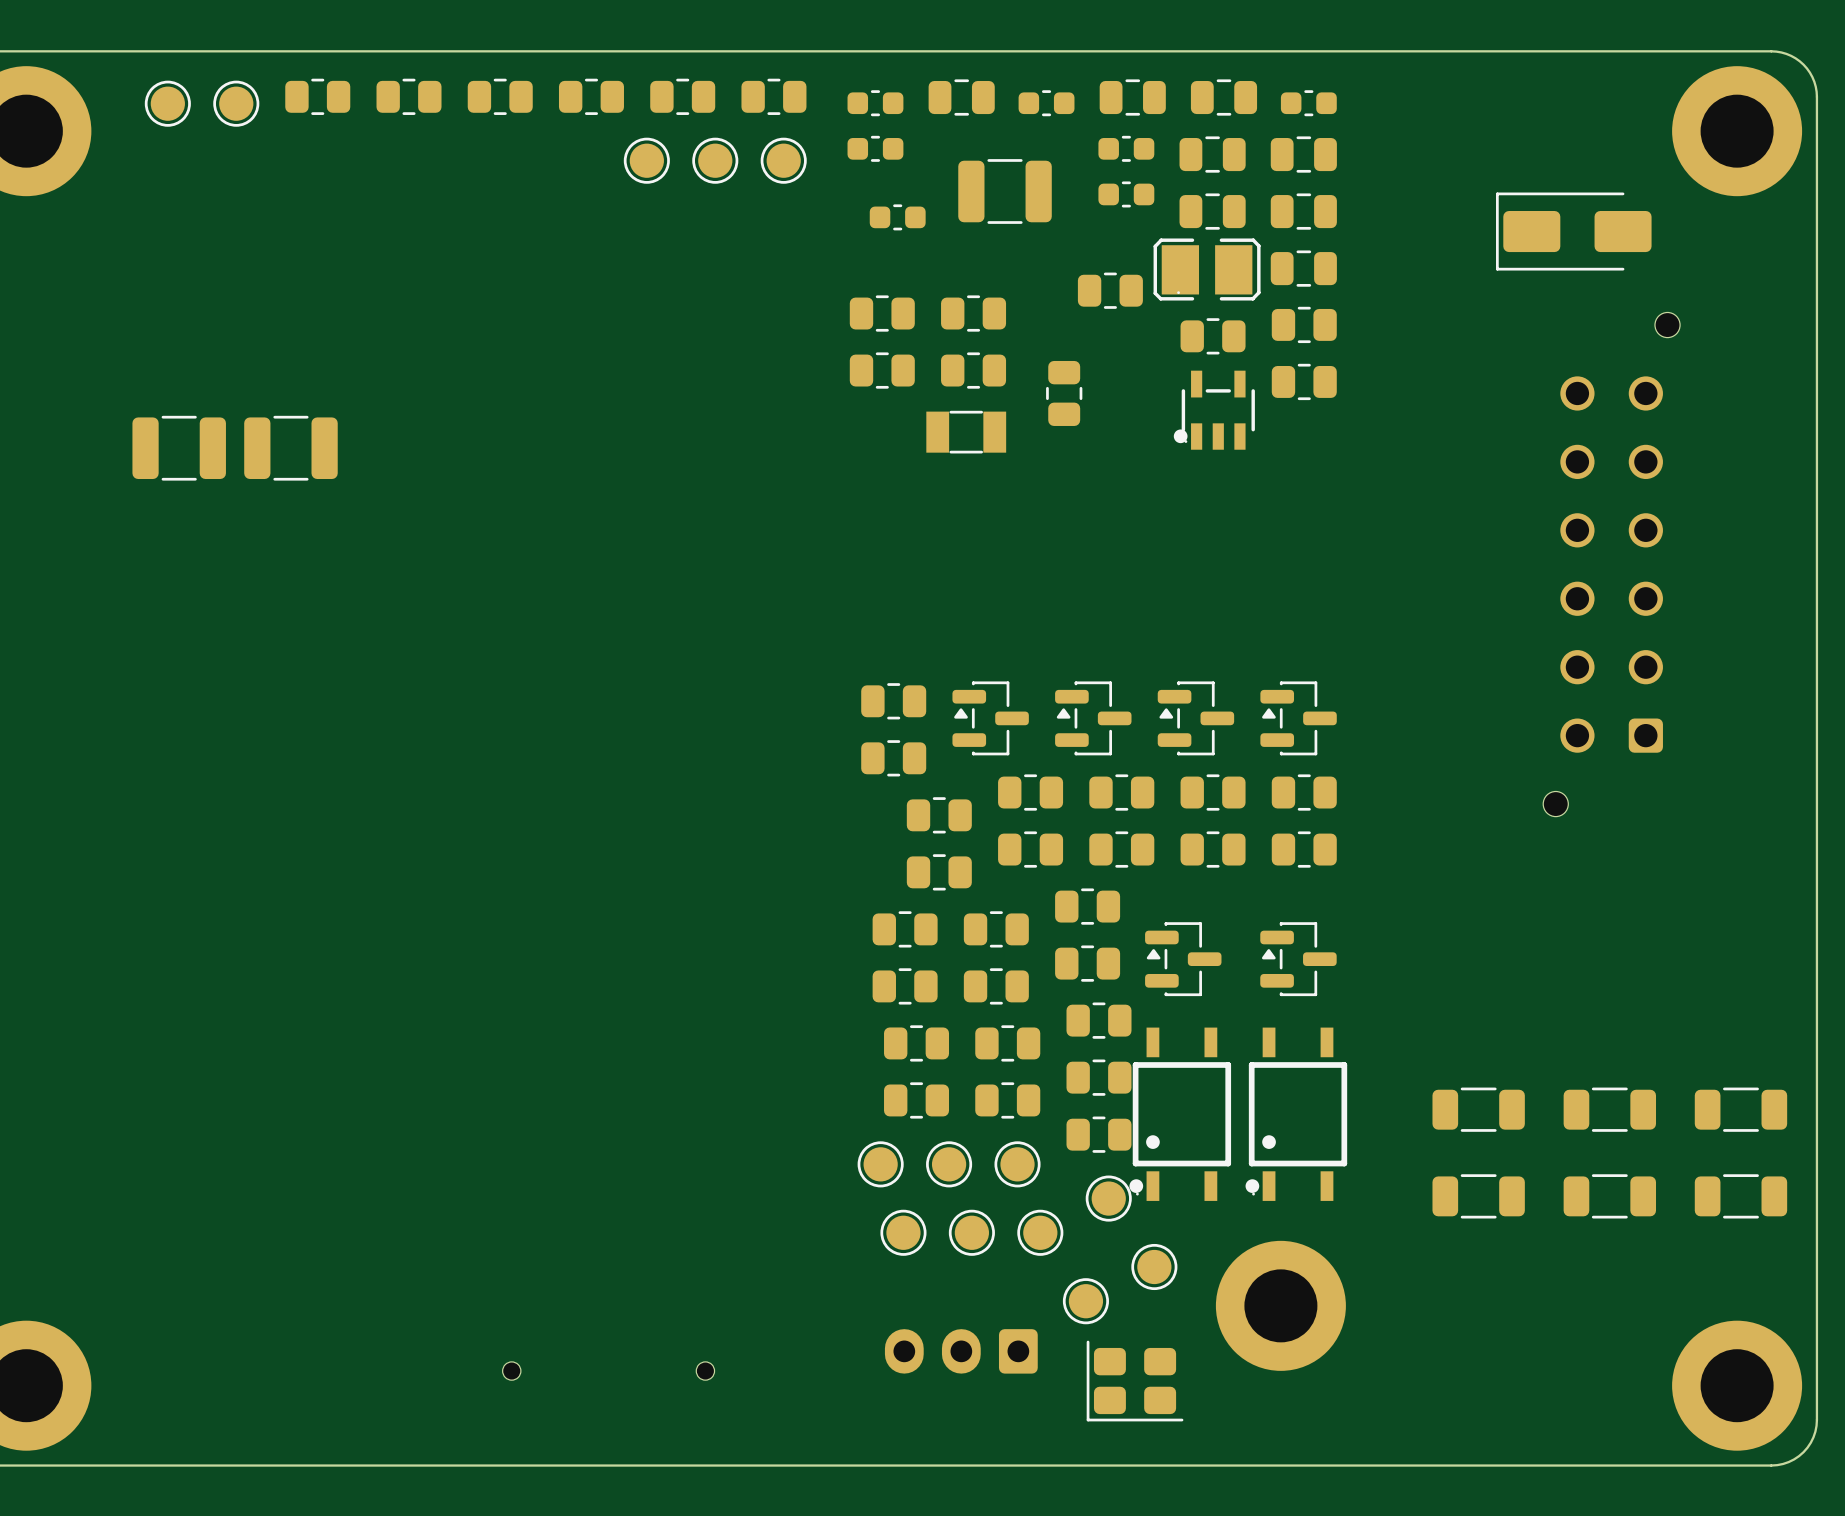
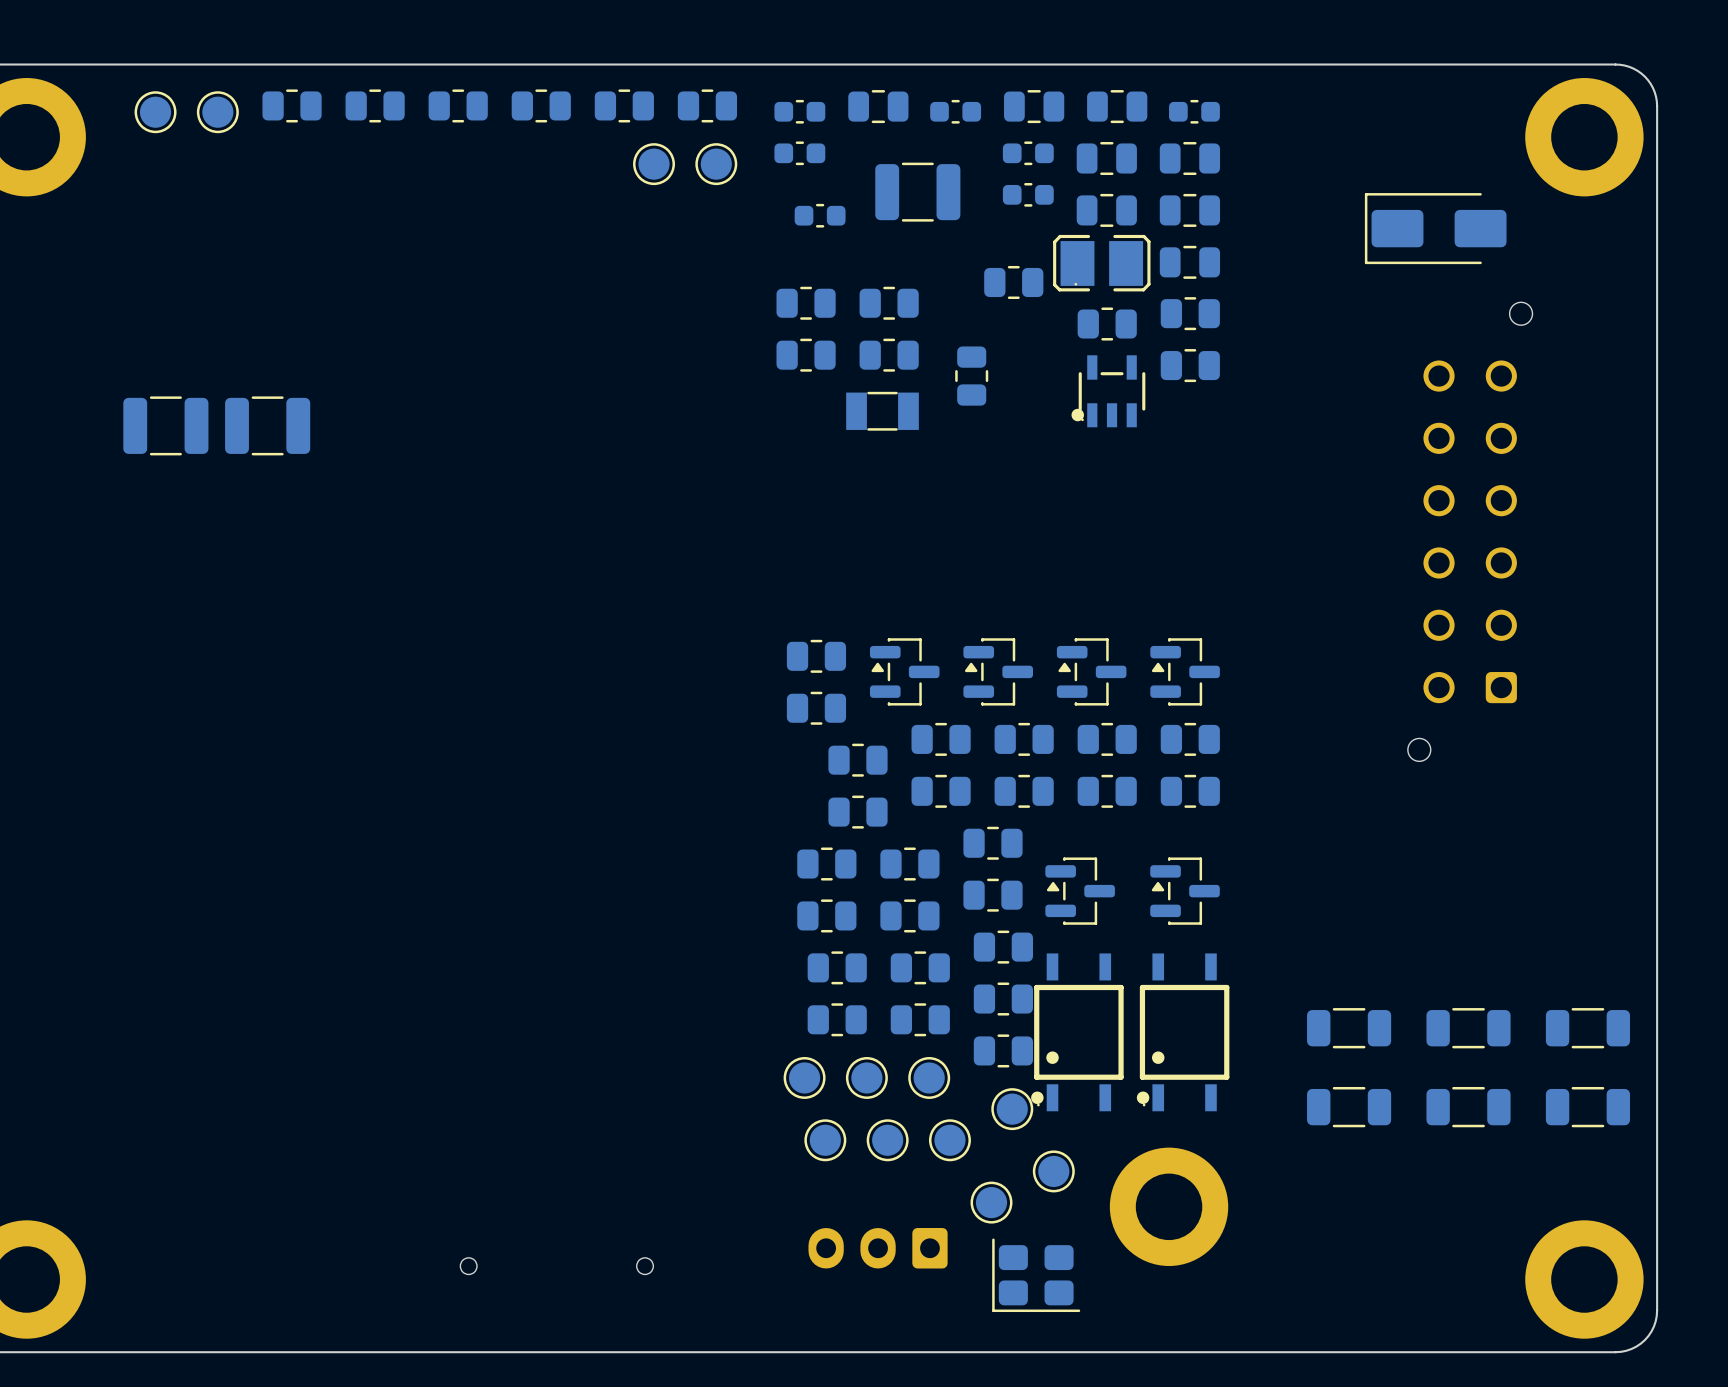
part: (646, 160) -> none

